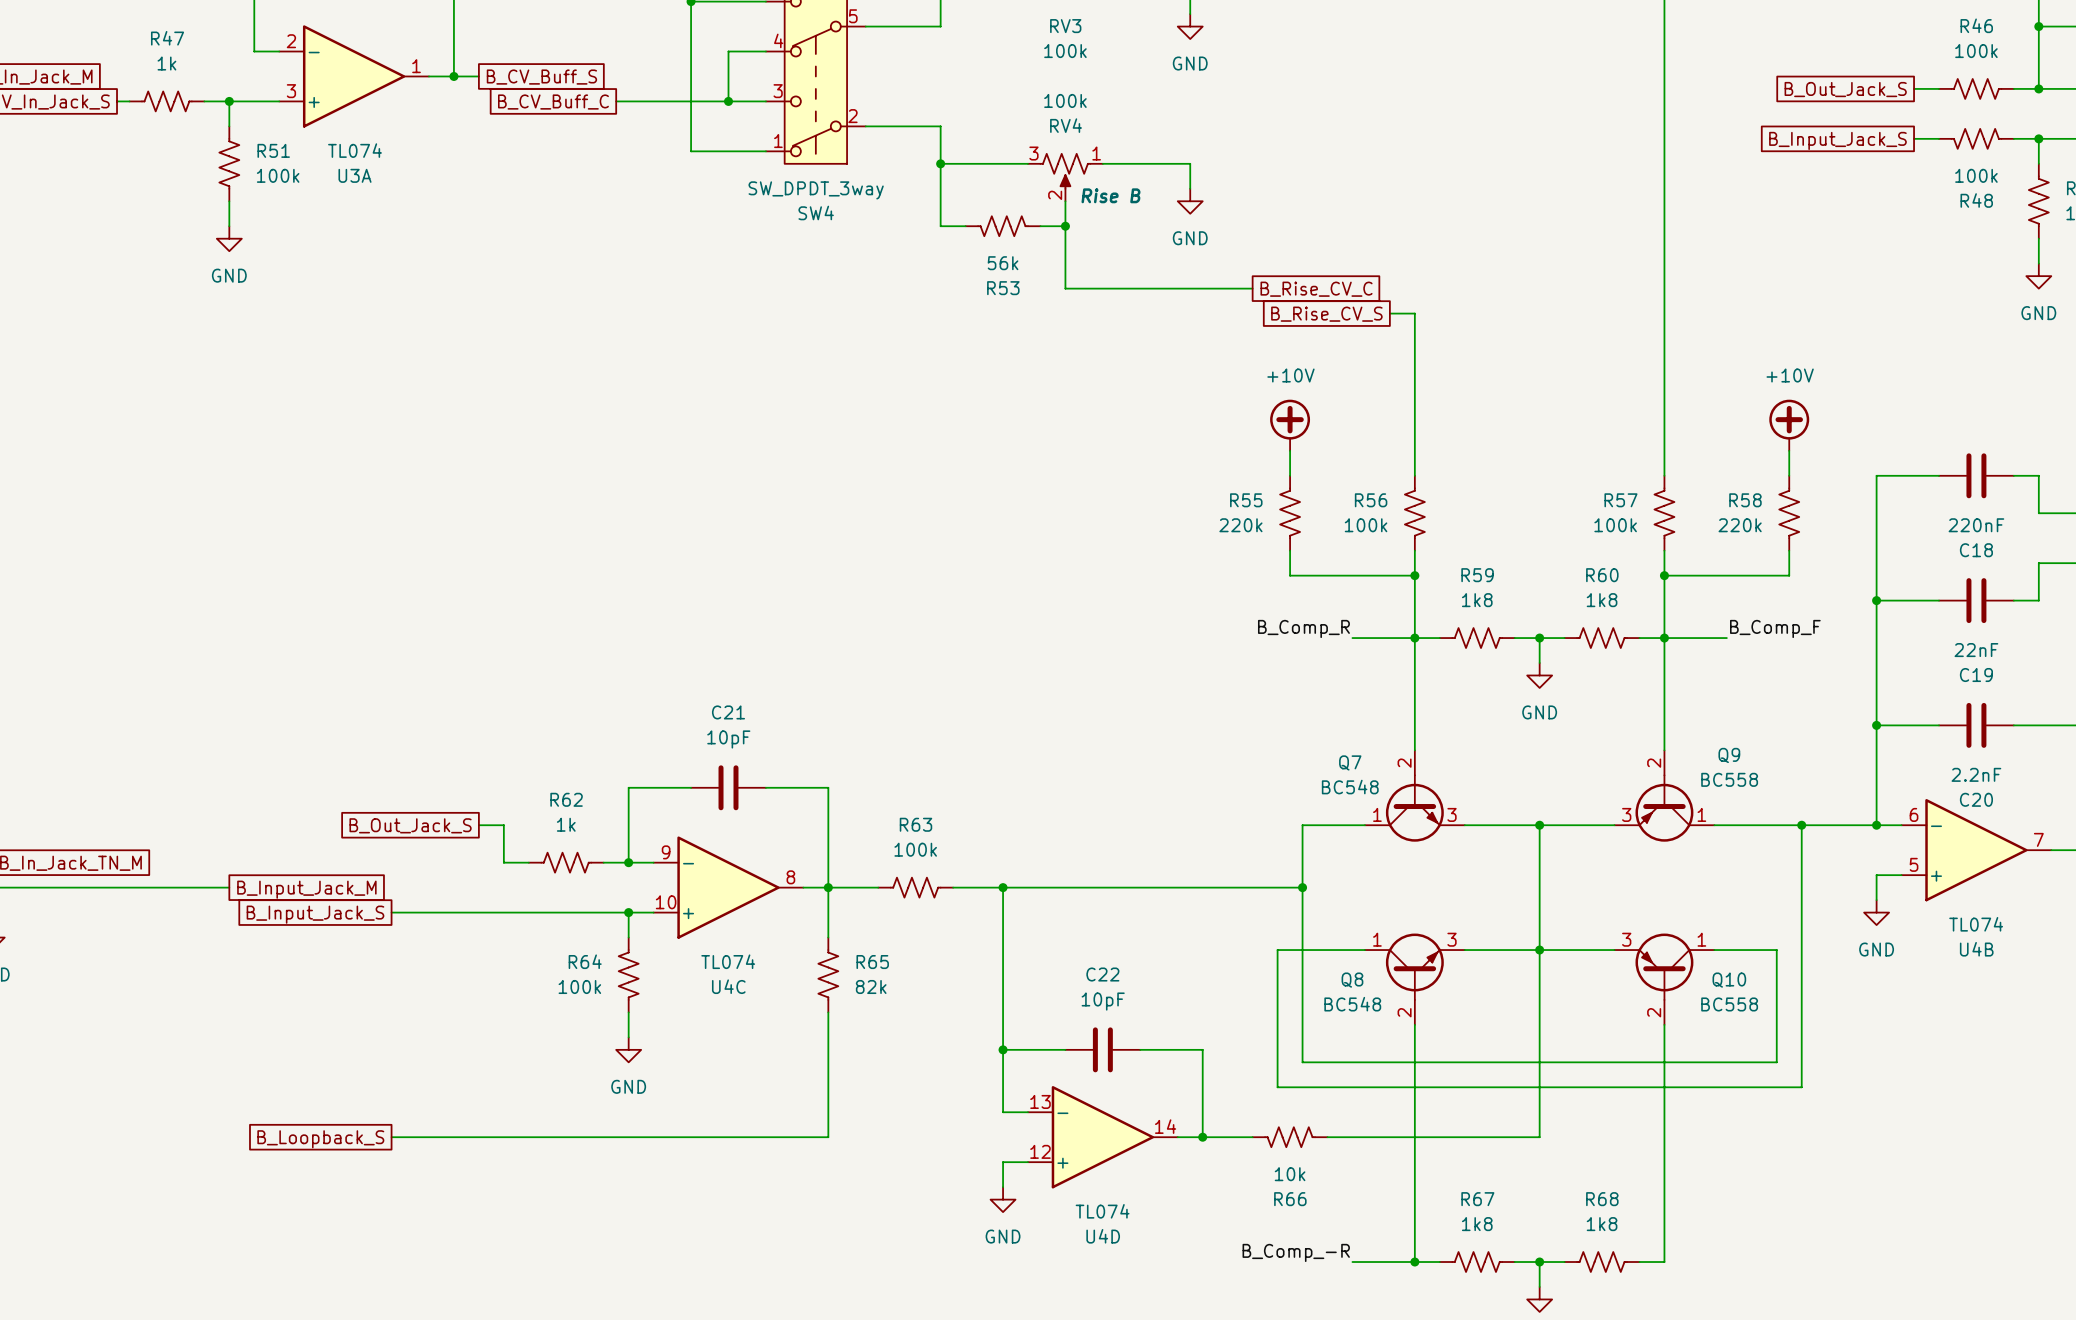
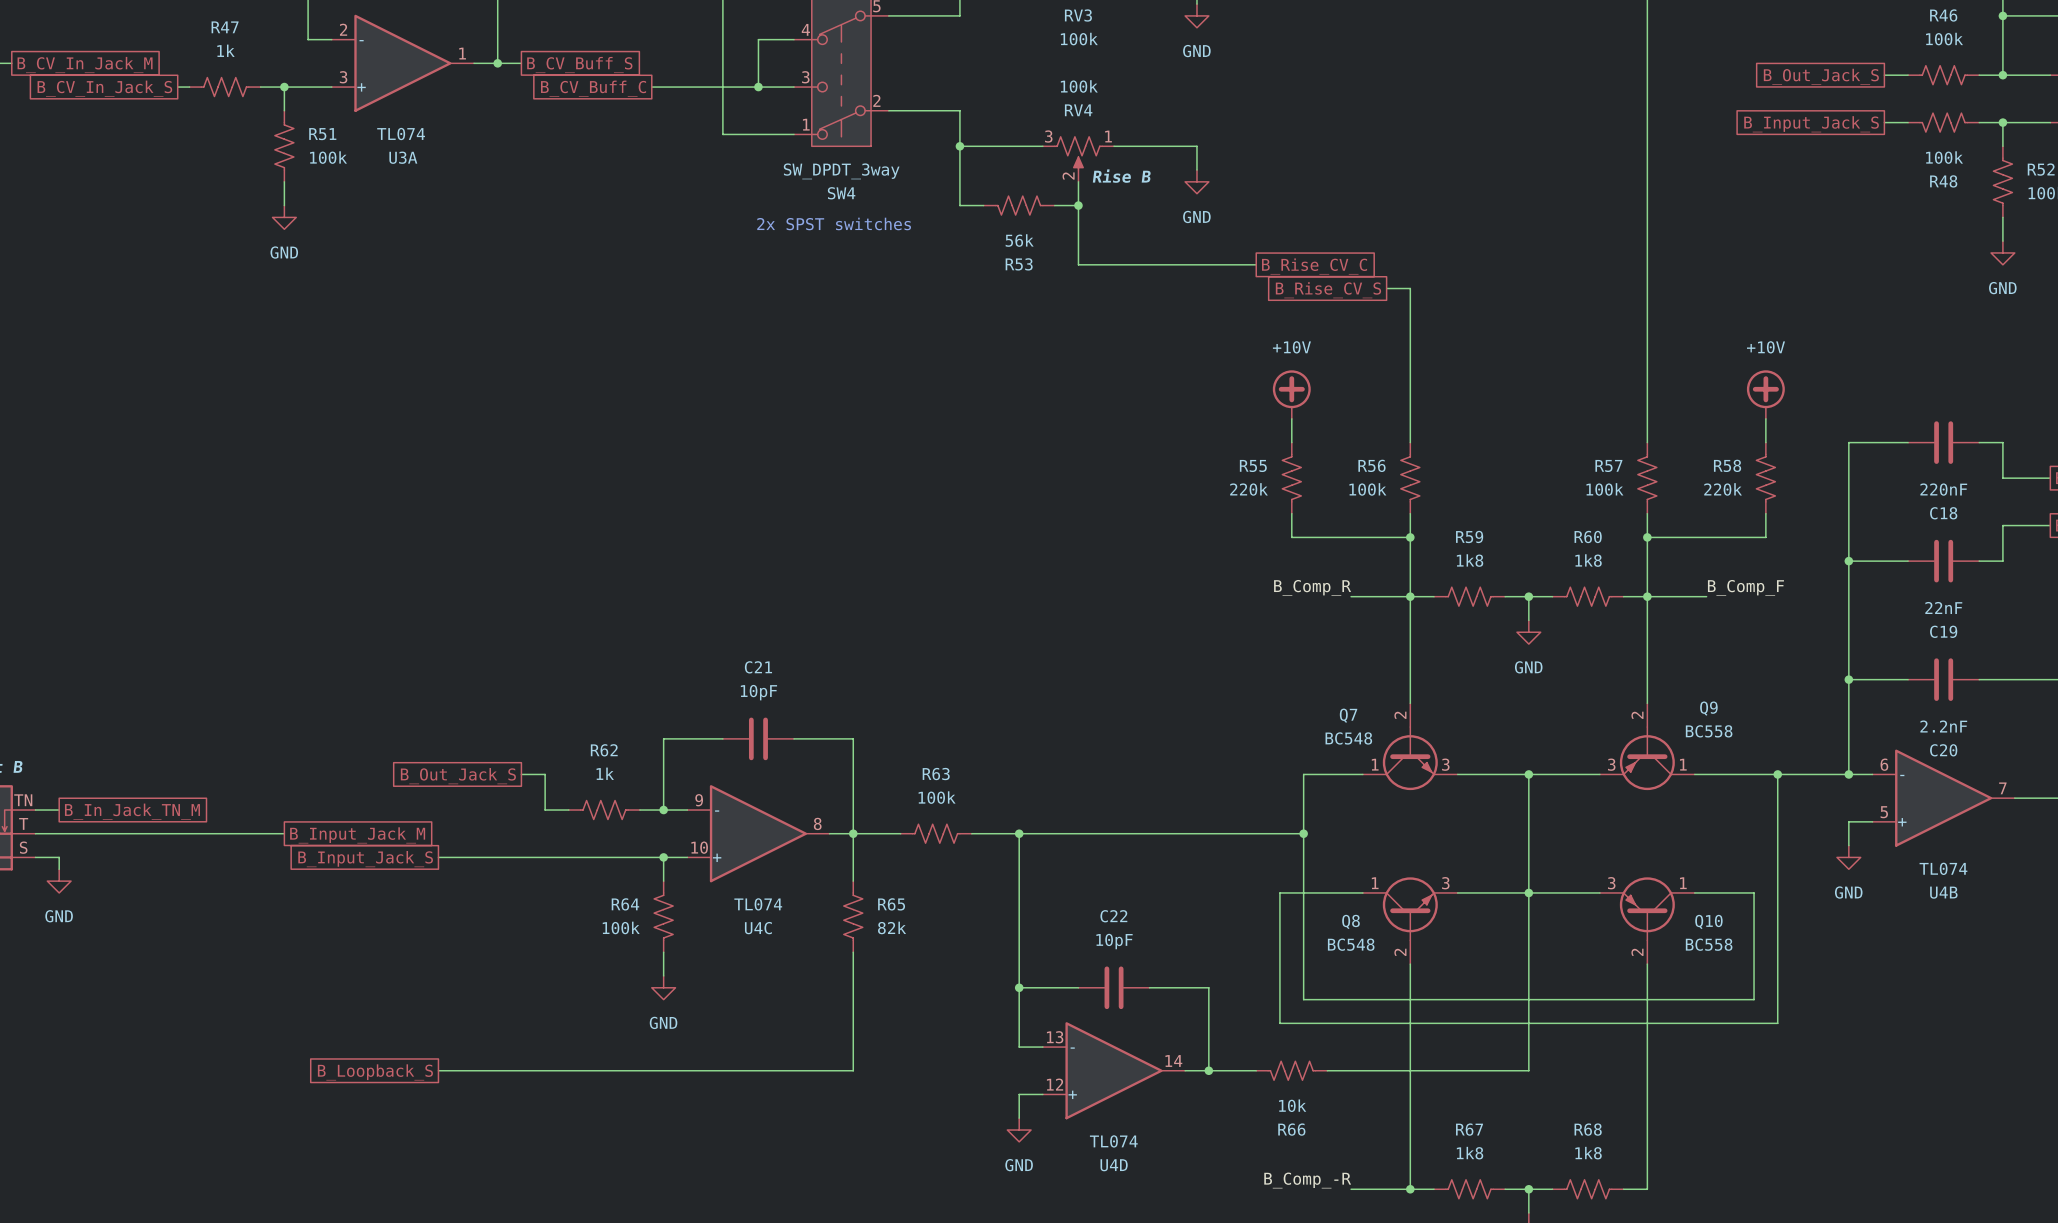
text: none -> 2x SPST switches (834, 223)

